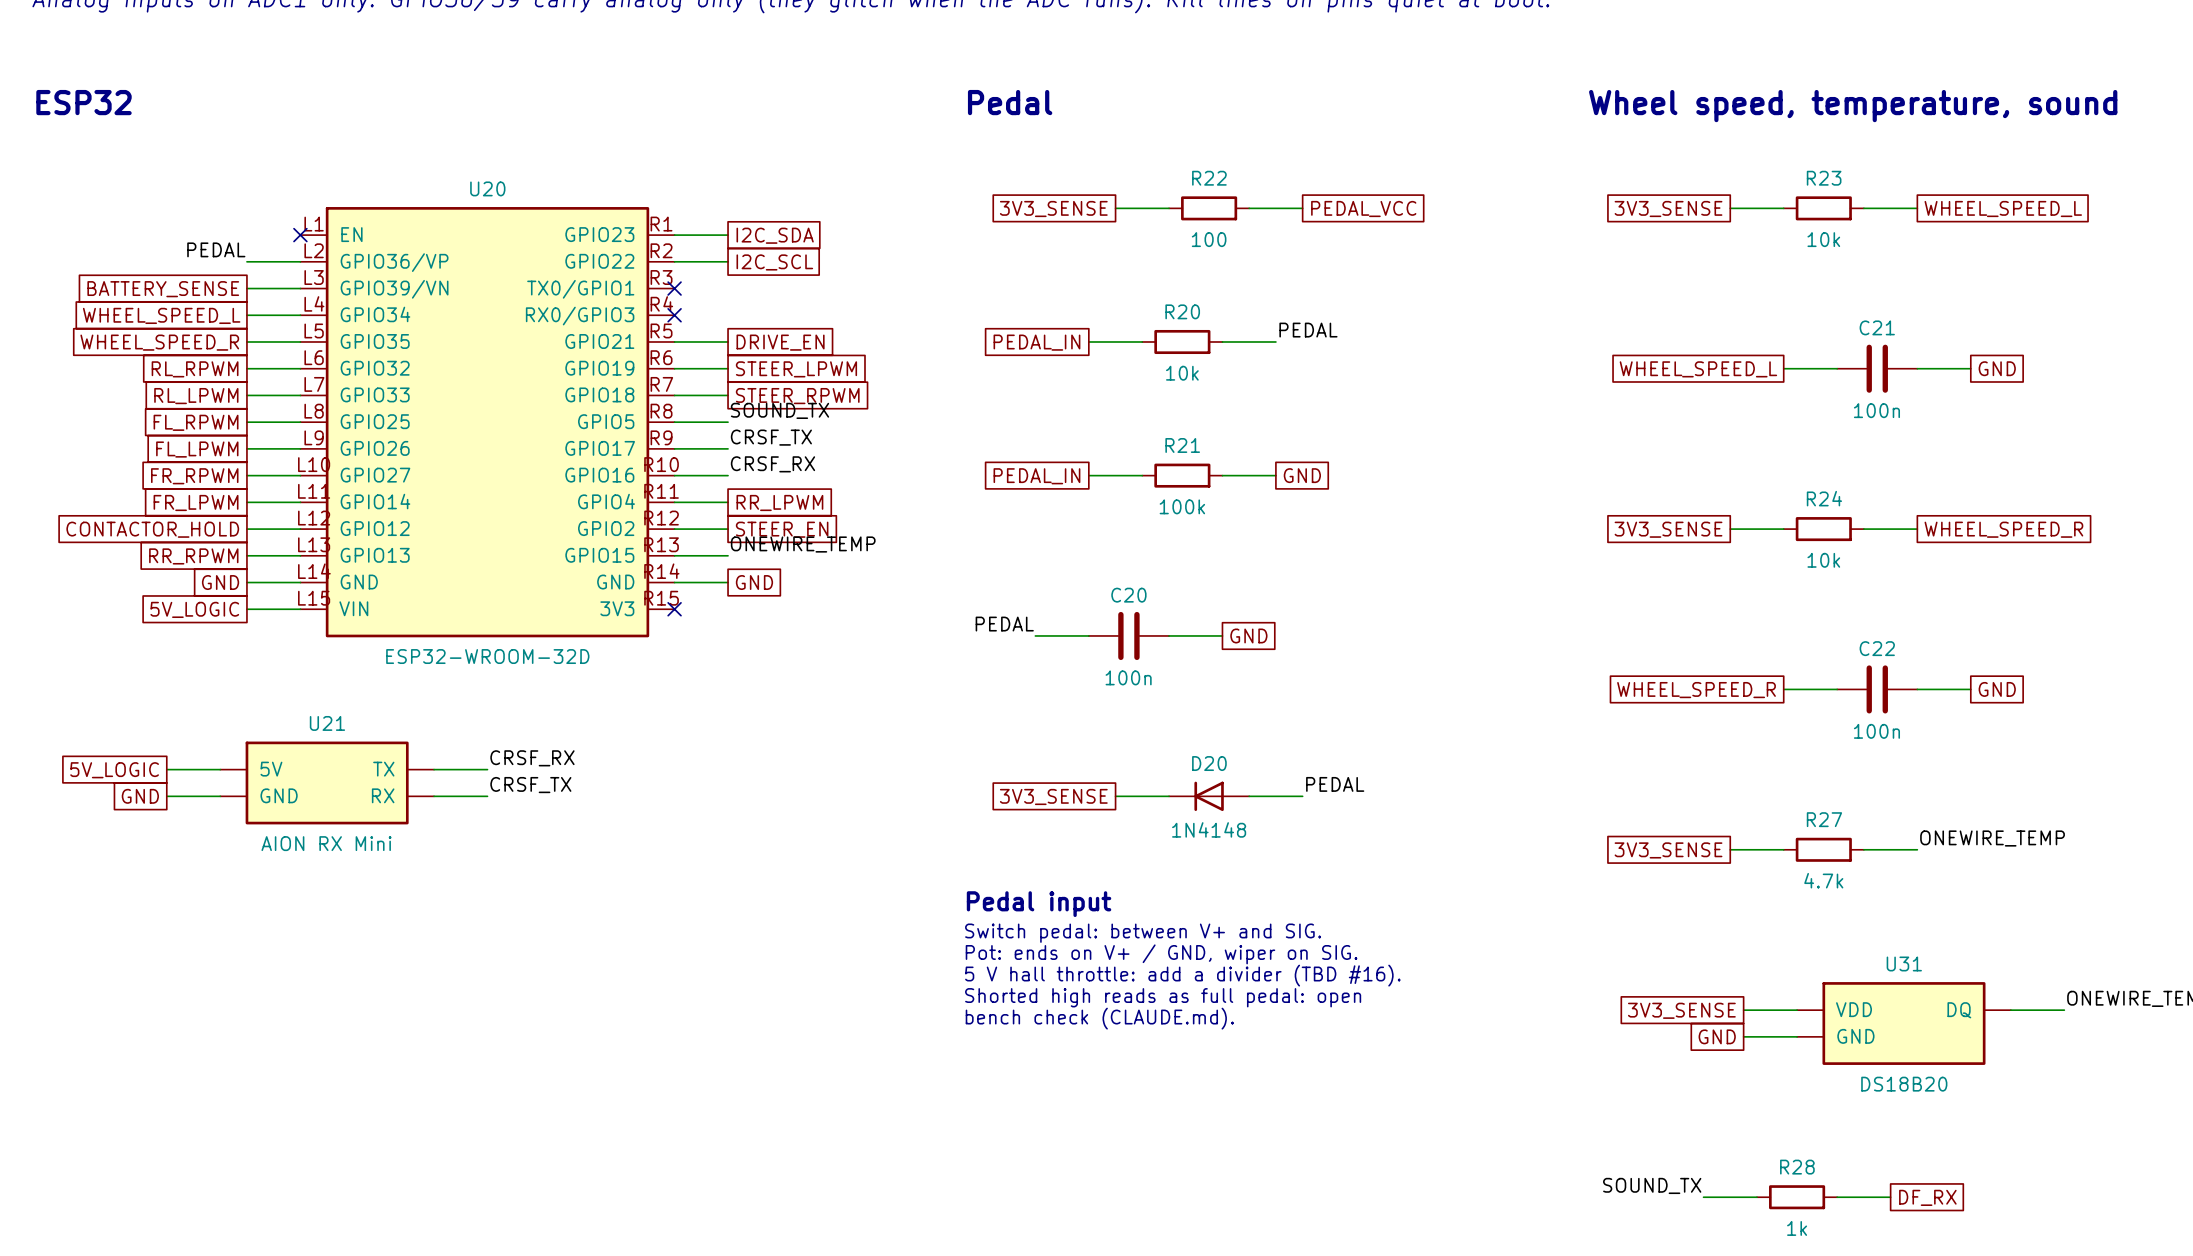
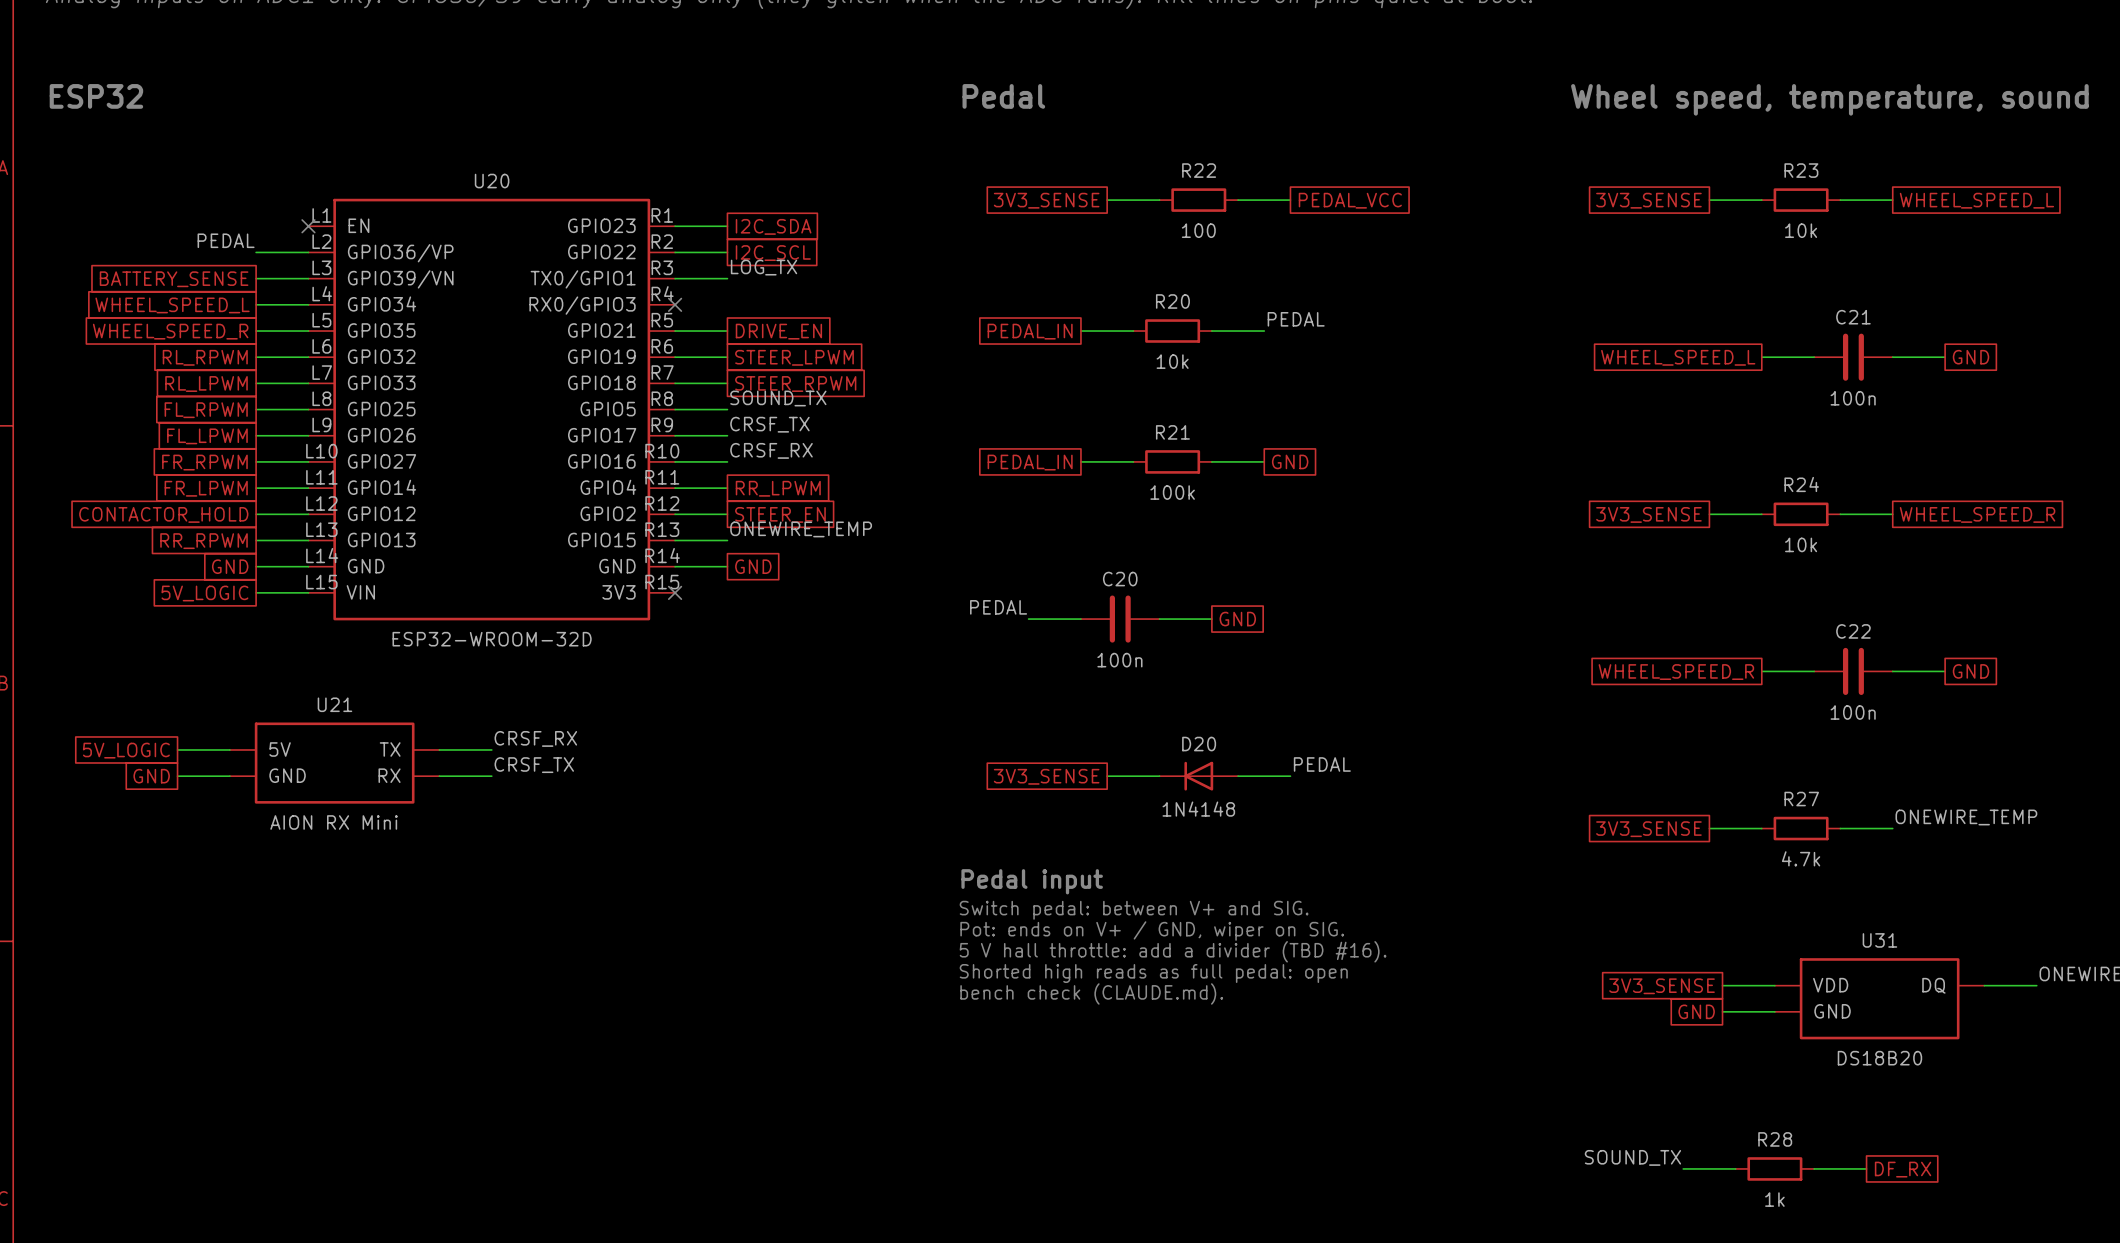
label: none -> LOG_TX (764, 267)
wire: none -> (675, 278) (727, 278)
no-connect mark: (674, 288) -> none

